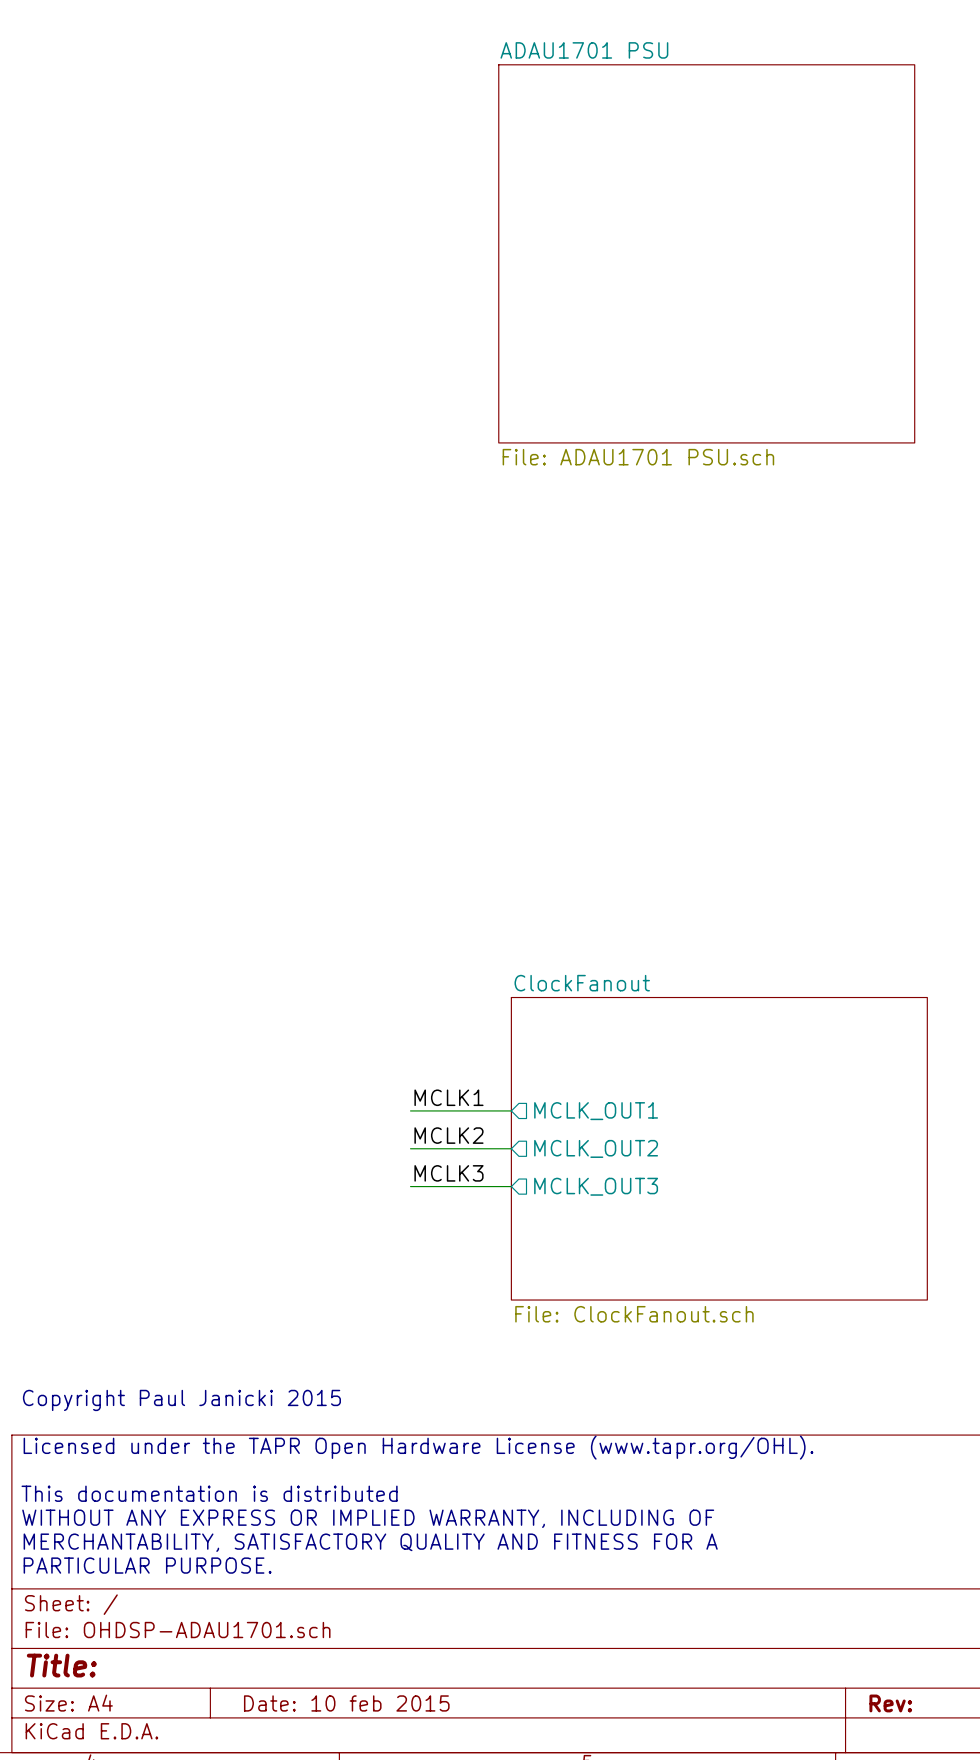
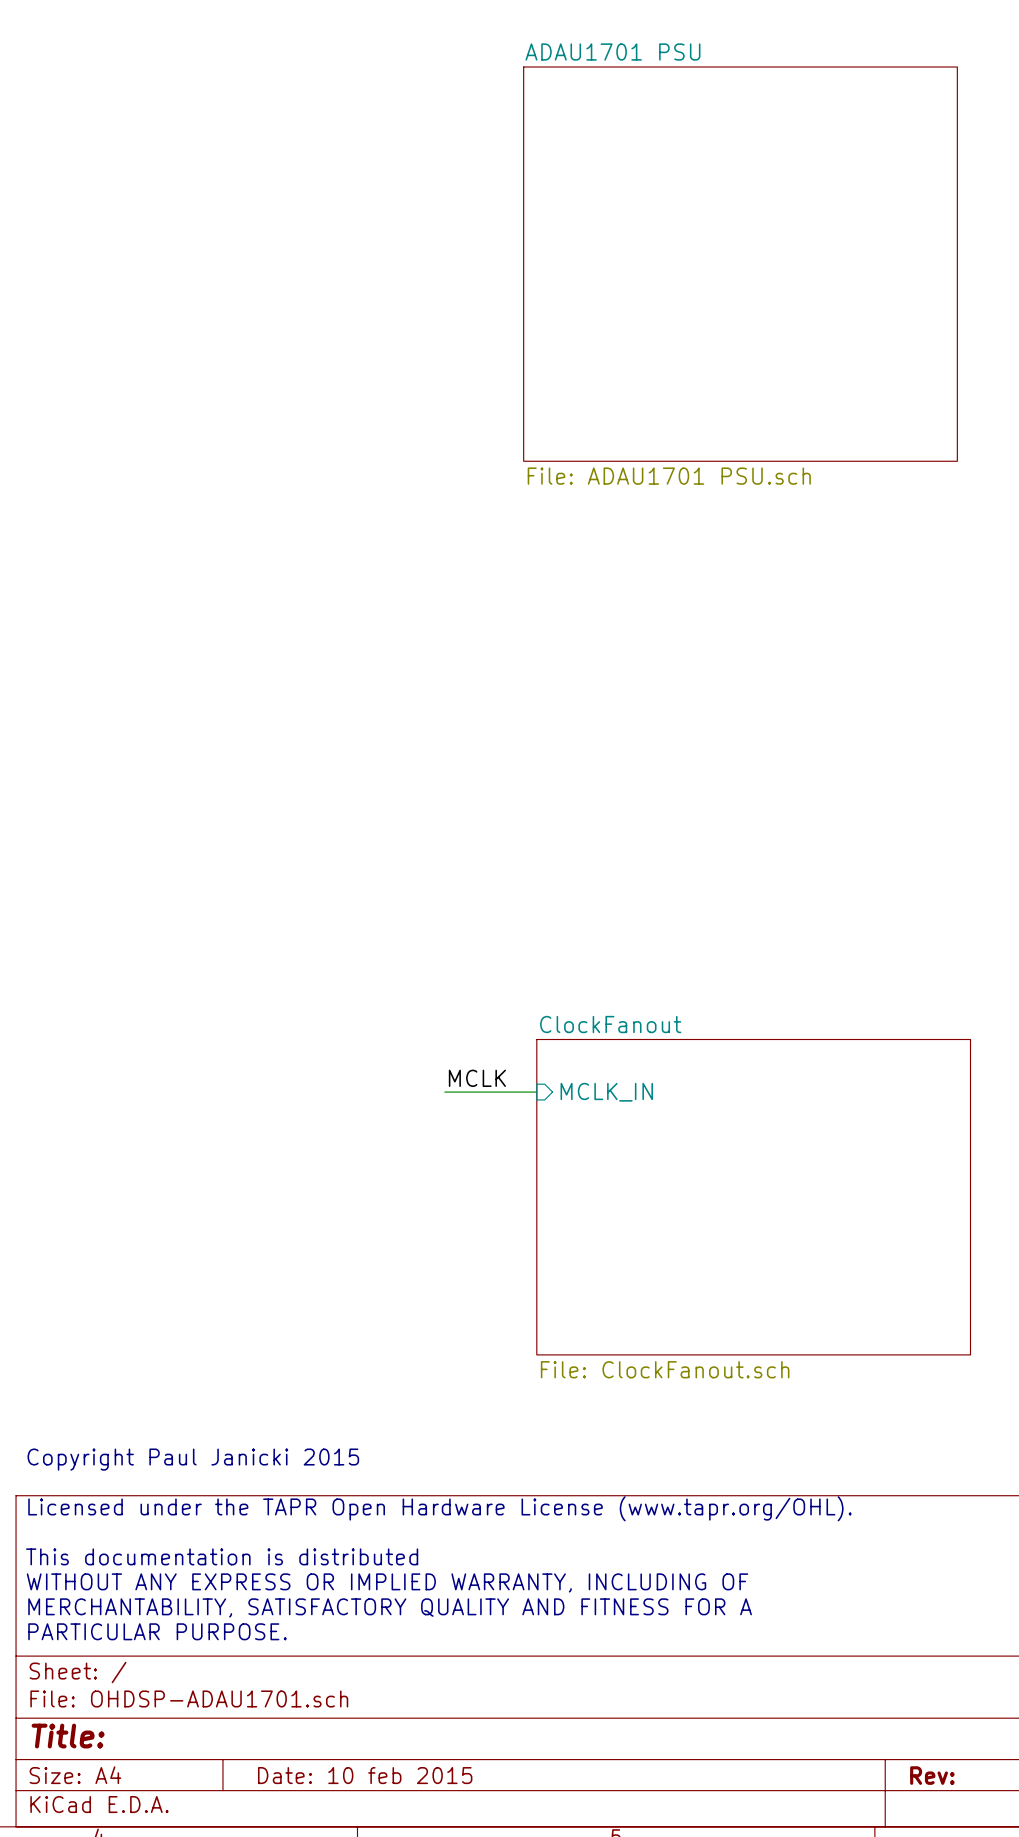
label: none -> MCLK (477, 1078)
wire: none -> (444, 1092) (536, 1092)
sheet pin: none -> MCLK_IN (606, 1092)
label: MCLK1 (448, 1097) -> none
wire: (410, 1110) (511, 1110) -> none
sheet pin: MCLK_OUT1 (596, 1111) -> none
label: MCLK2 (448, 1135) -> none
wire: (410, 1148) (511, 1148) -> none
sheet pin: MCLK_OUT2 (596, 1148) -> none
label: MCLK3 (448, 1173) -> none
wire: (410, 1186) (511, 1186) -> none
sheet pin: MCLK_OUT3 (596, 1186) -> none

